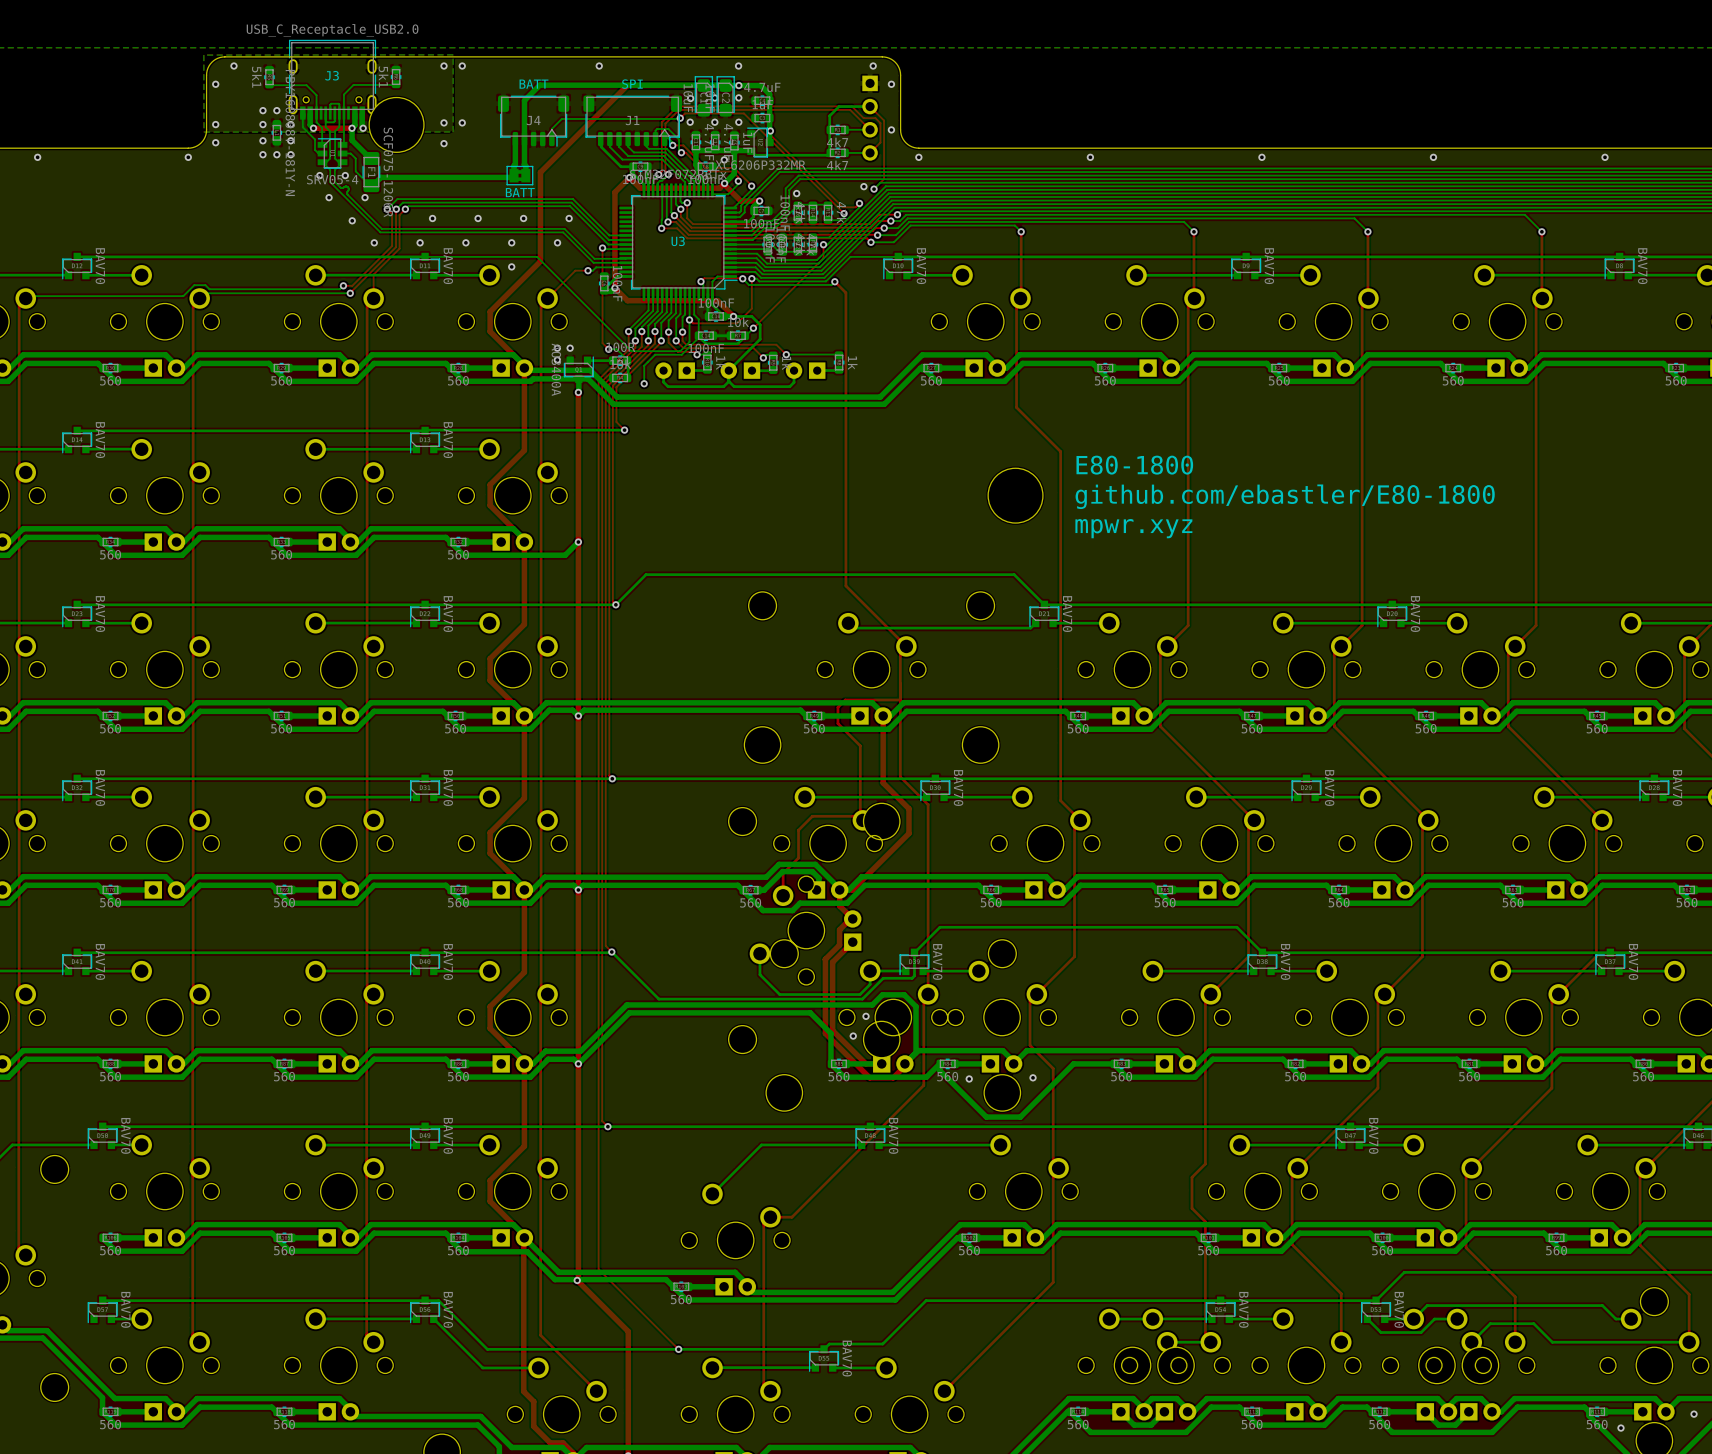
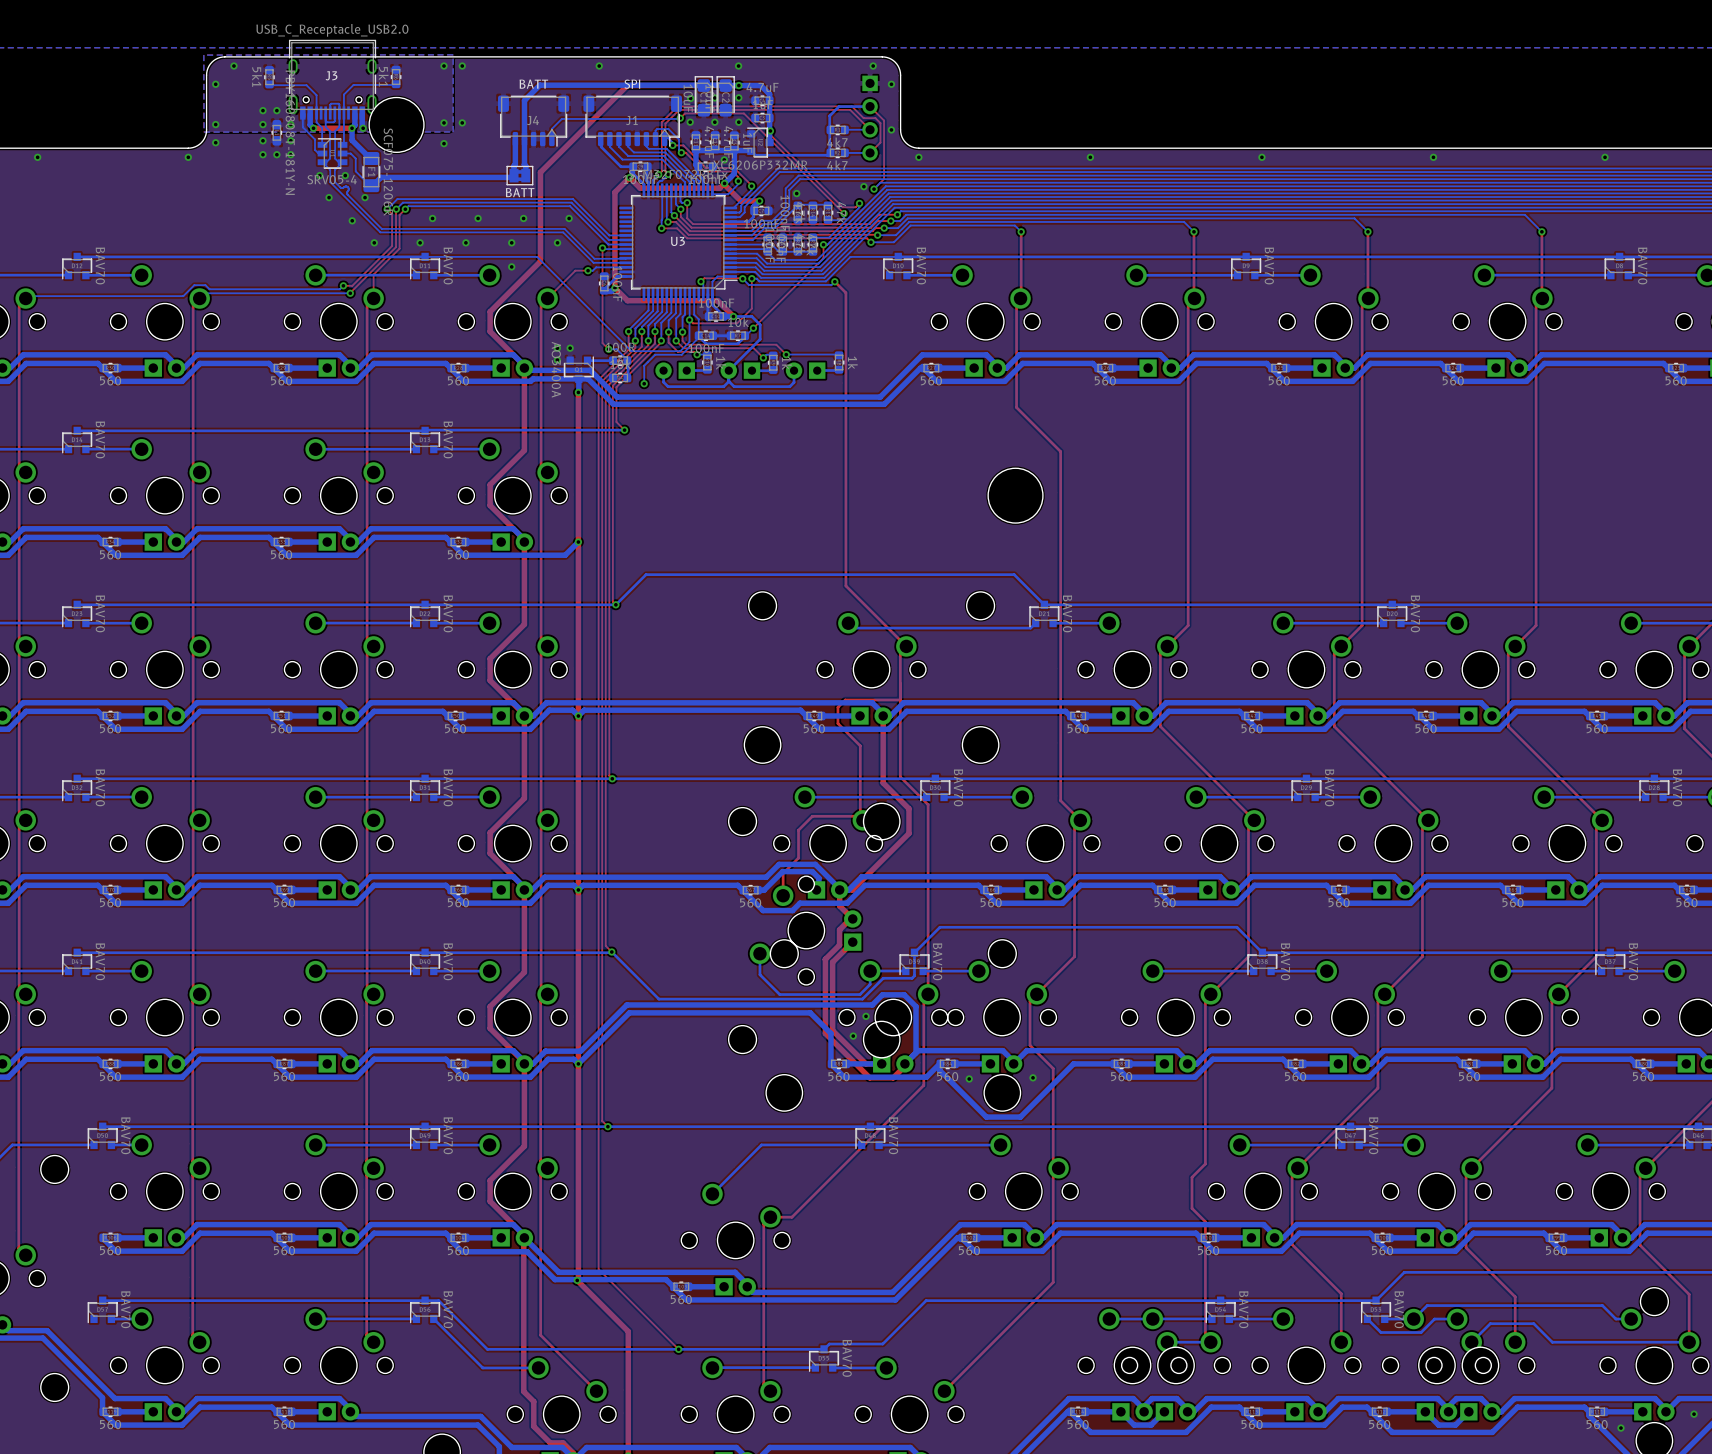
text: E80-1800 (1134, 465) -> none
text: github.com/ebastler/E80-1800 (1285, 496) -> none
text: mpwr.xyz (1133, 528) -> none

